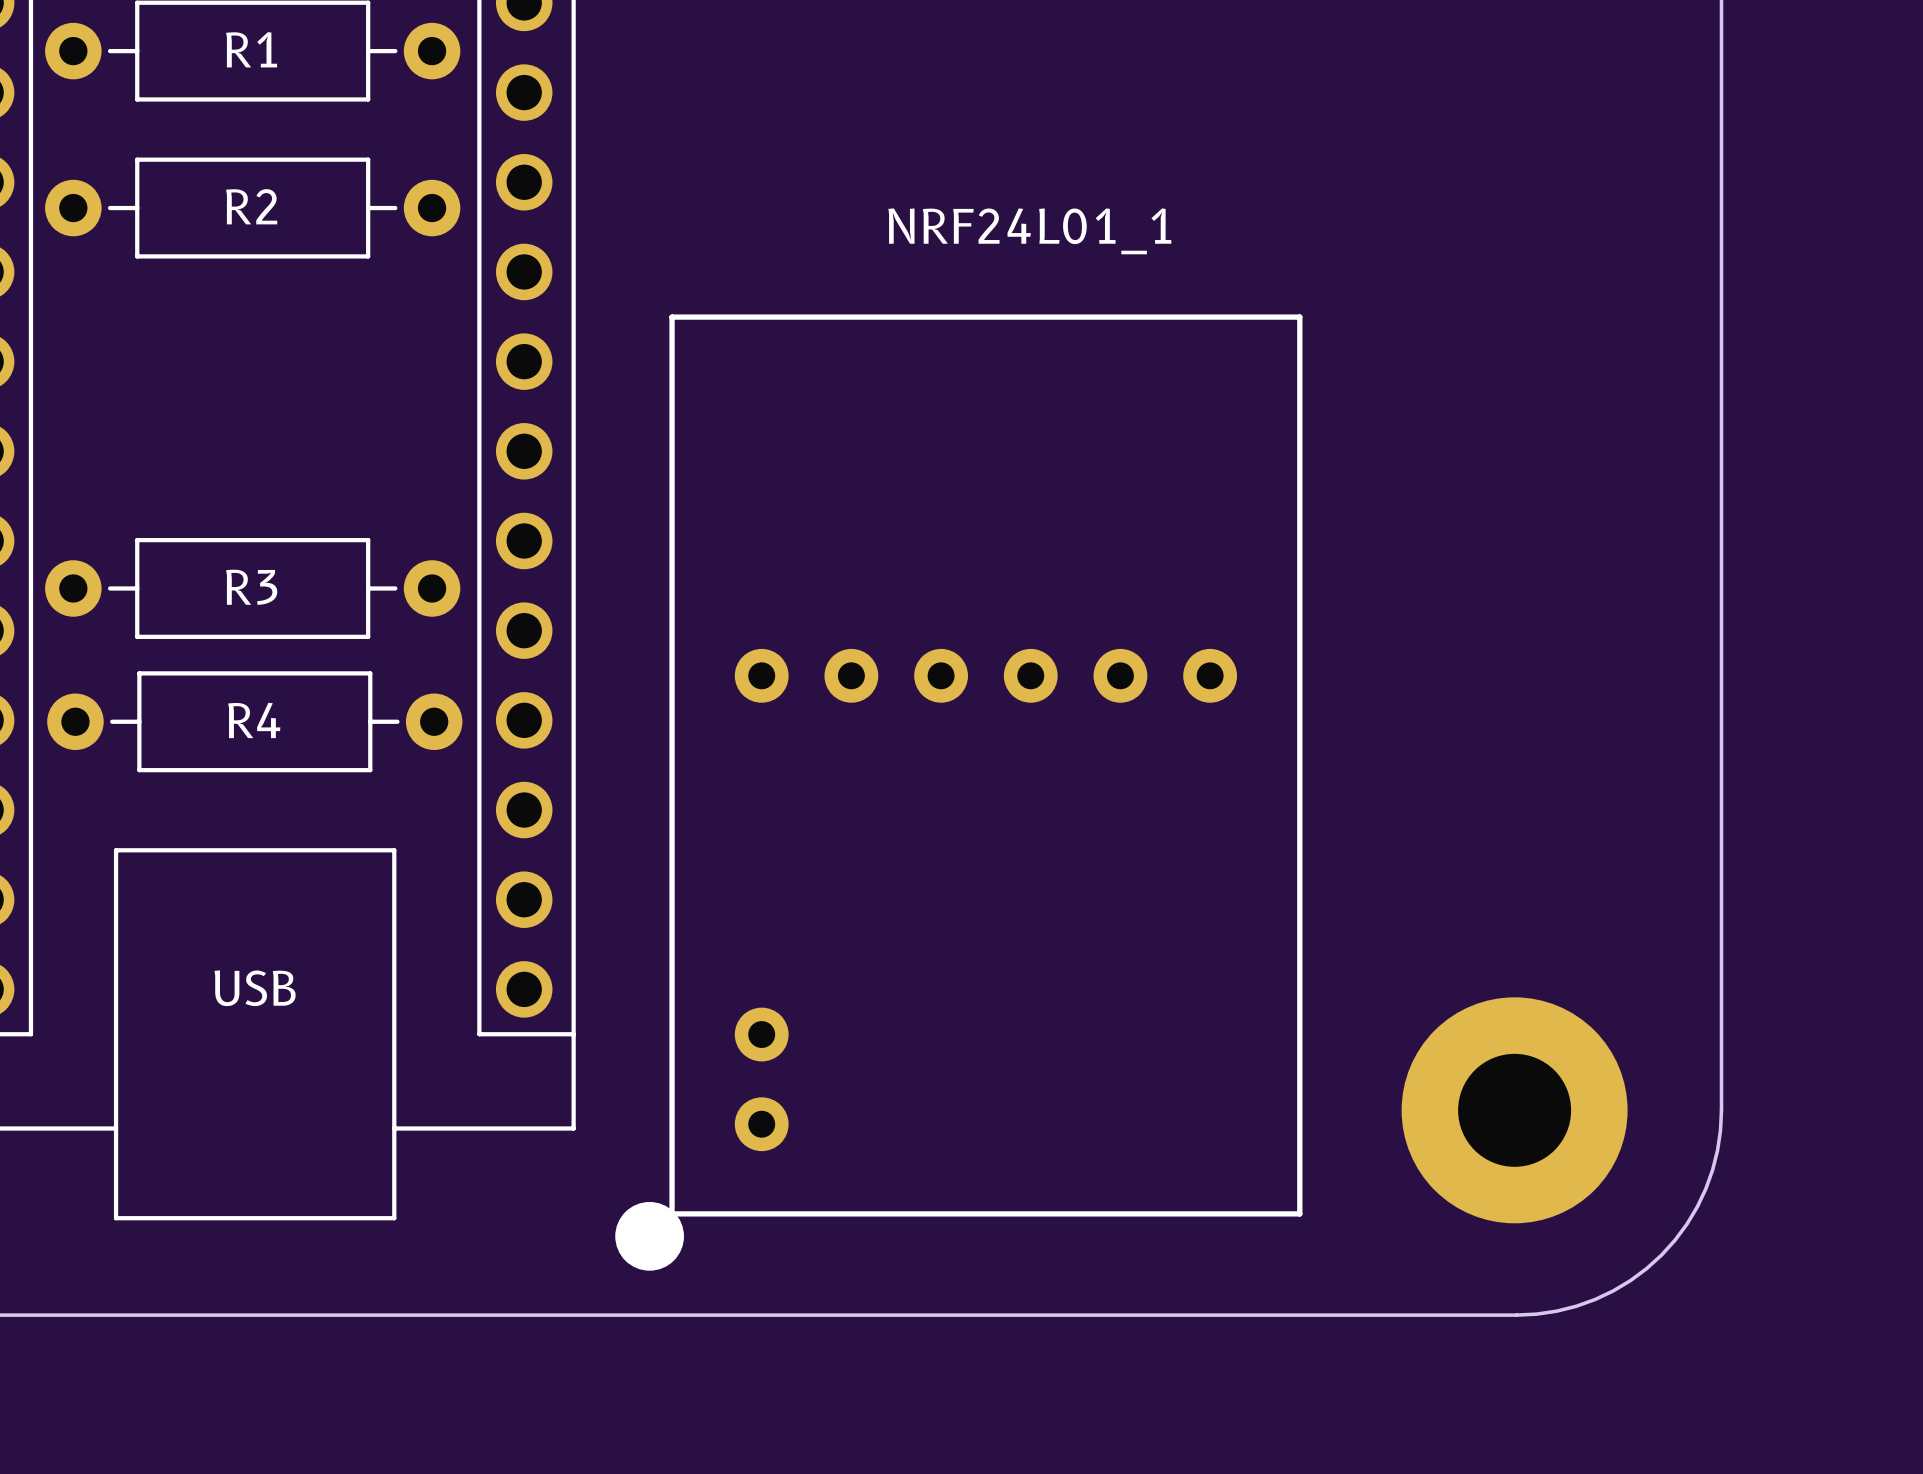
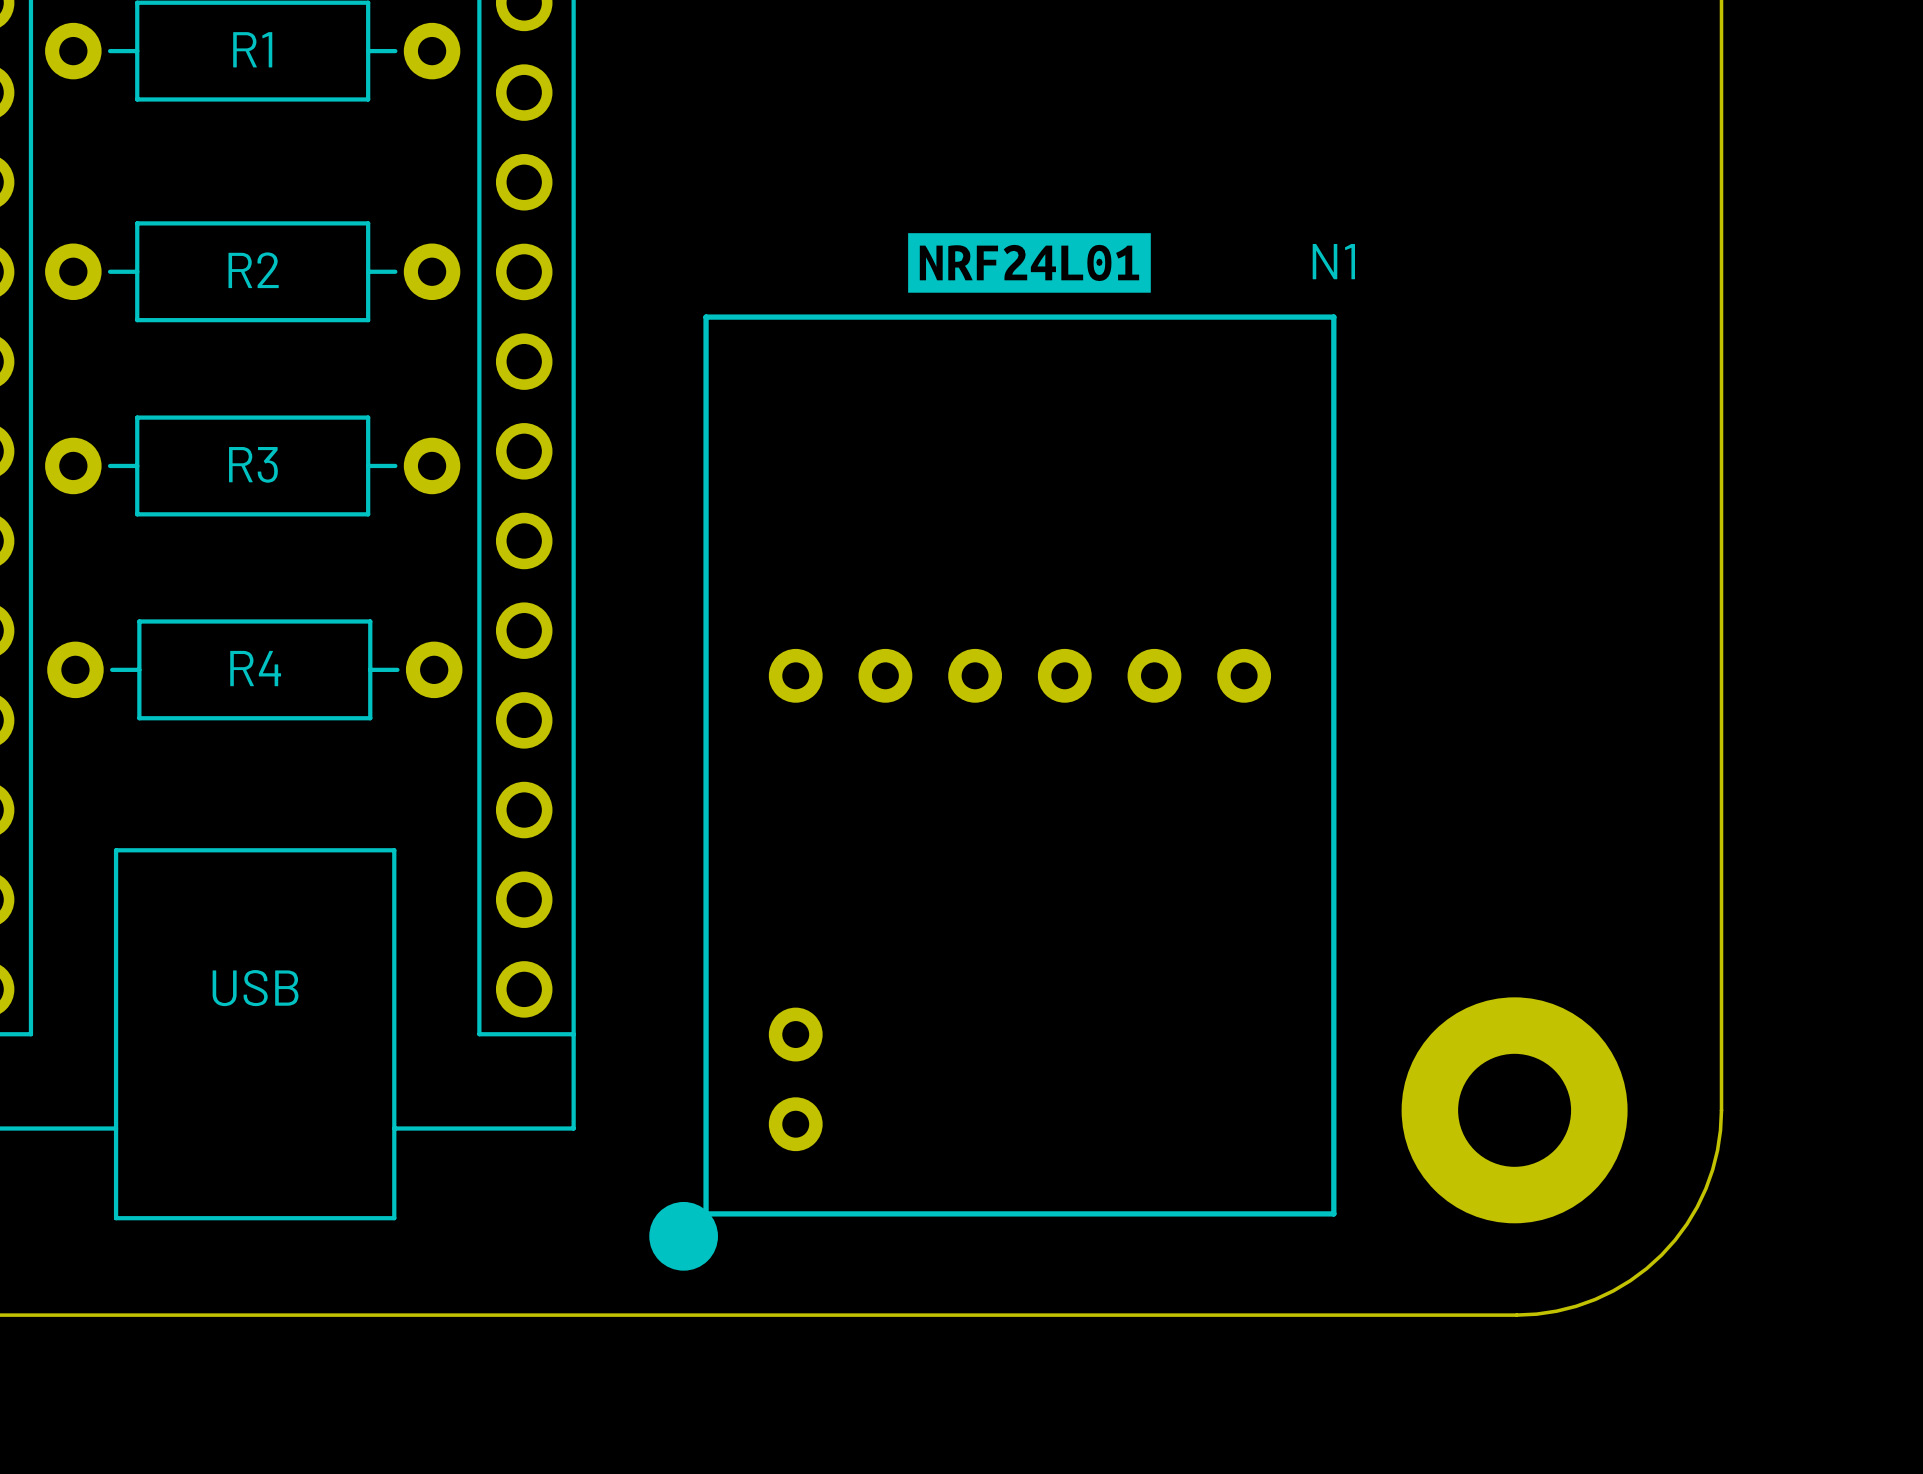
R2 position: (252, 208) -> (252, 271)
NRF24L01_1 name: NRF24L01_1 (1029, 231) -> N1 (1333, 261)
drawing: none -> [908, 233, 1151, 293]
R3 position: (252, 588) -> (252, 465)
R4 position: (254, 721) -> (254, 669)
NRF24L01_1 position: (958, 792) -> (992, 792)

